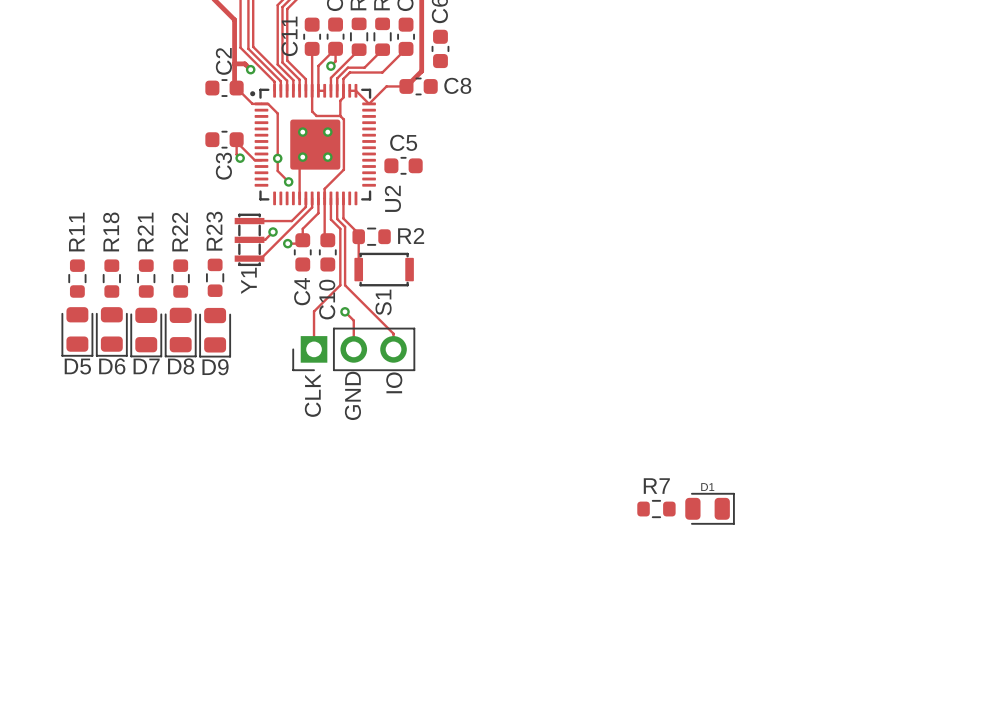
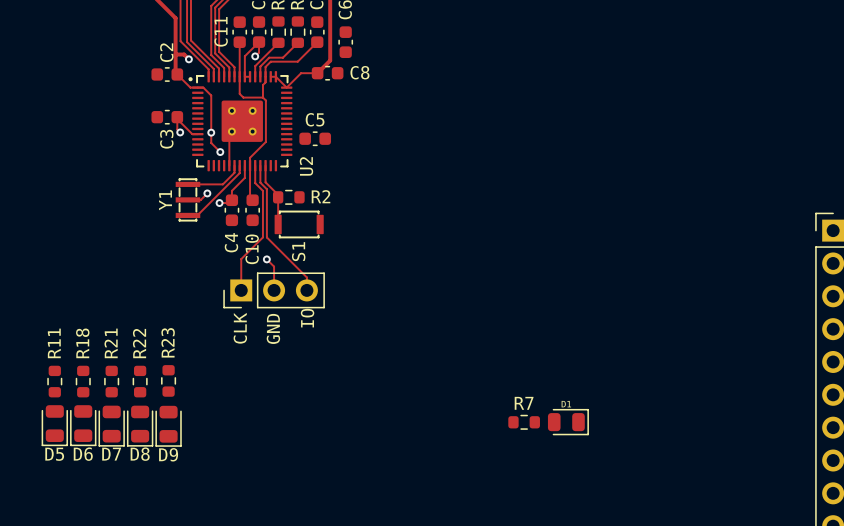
R23 position: (215, 277) -> (168, 380)
R11 position: (77, 278) -> (54, 381)
R18 position: (111, 278) -> (83, 381)
R21 position: (146, 278) -> (111, 381)
R22 position: (180, 278) -> (140, 381)
Y1 name position: Y1 (248, 280) -> Y1 (165, 200)
D5 position: (77, 331) -> (54, 425)
D6 position: (111, 331) -> (83, 425)
D7 position: (146, 332) -> (111, 426)
D8 position: (180, 332) -> (140, 426)
D9 position: (215, 332) -> (168, 426)

